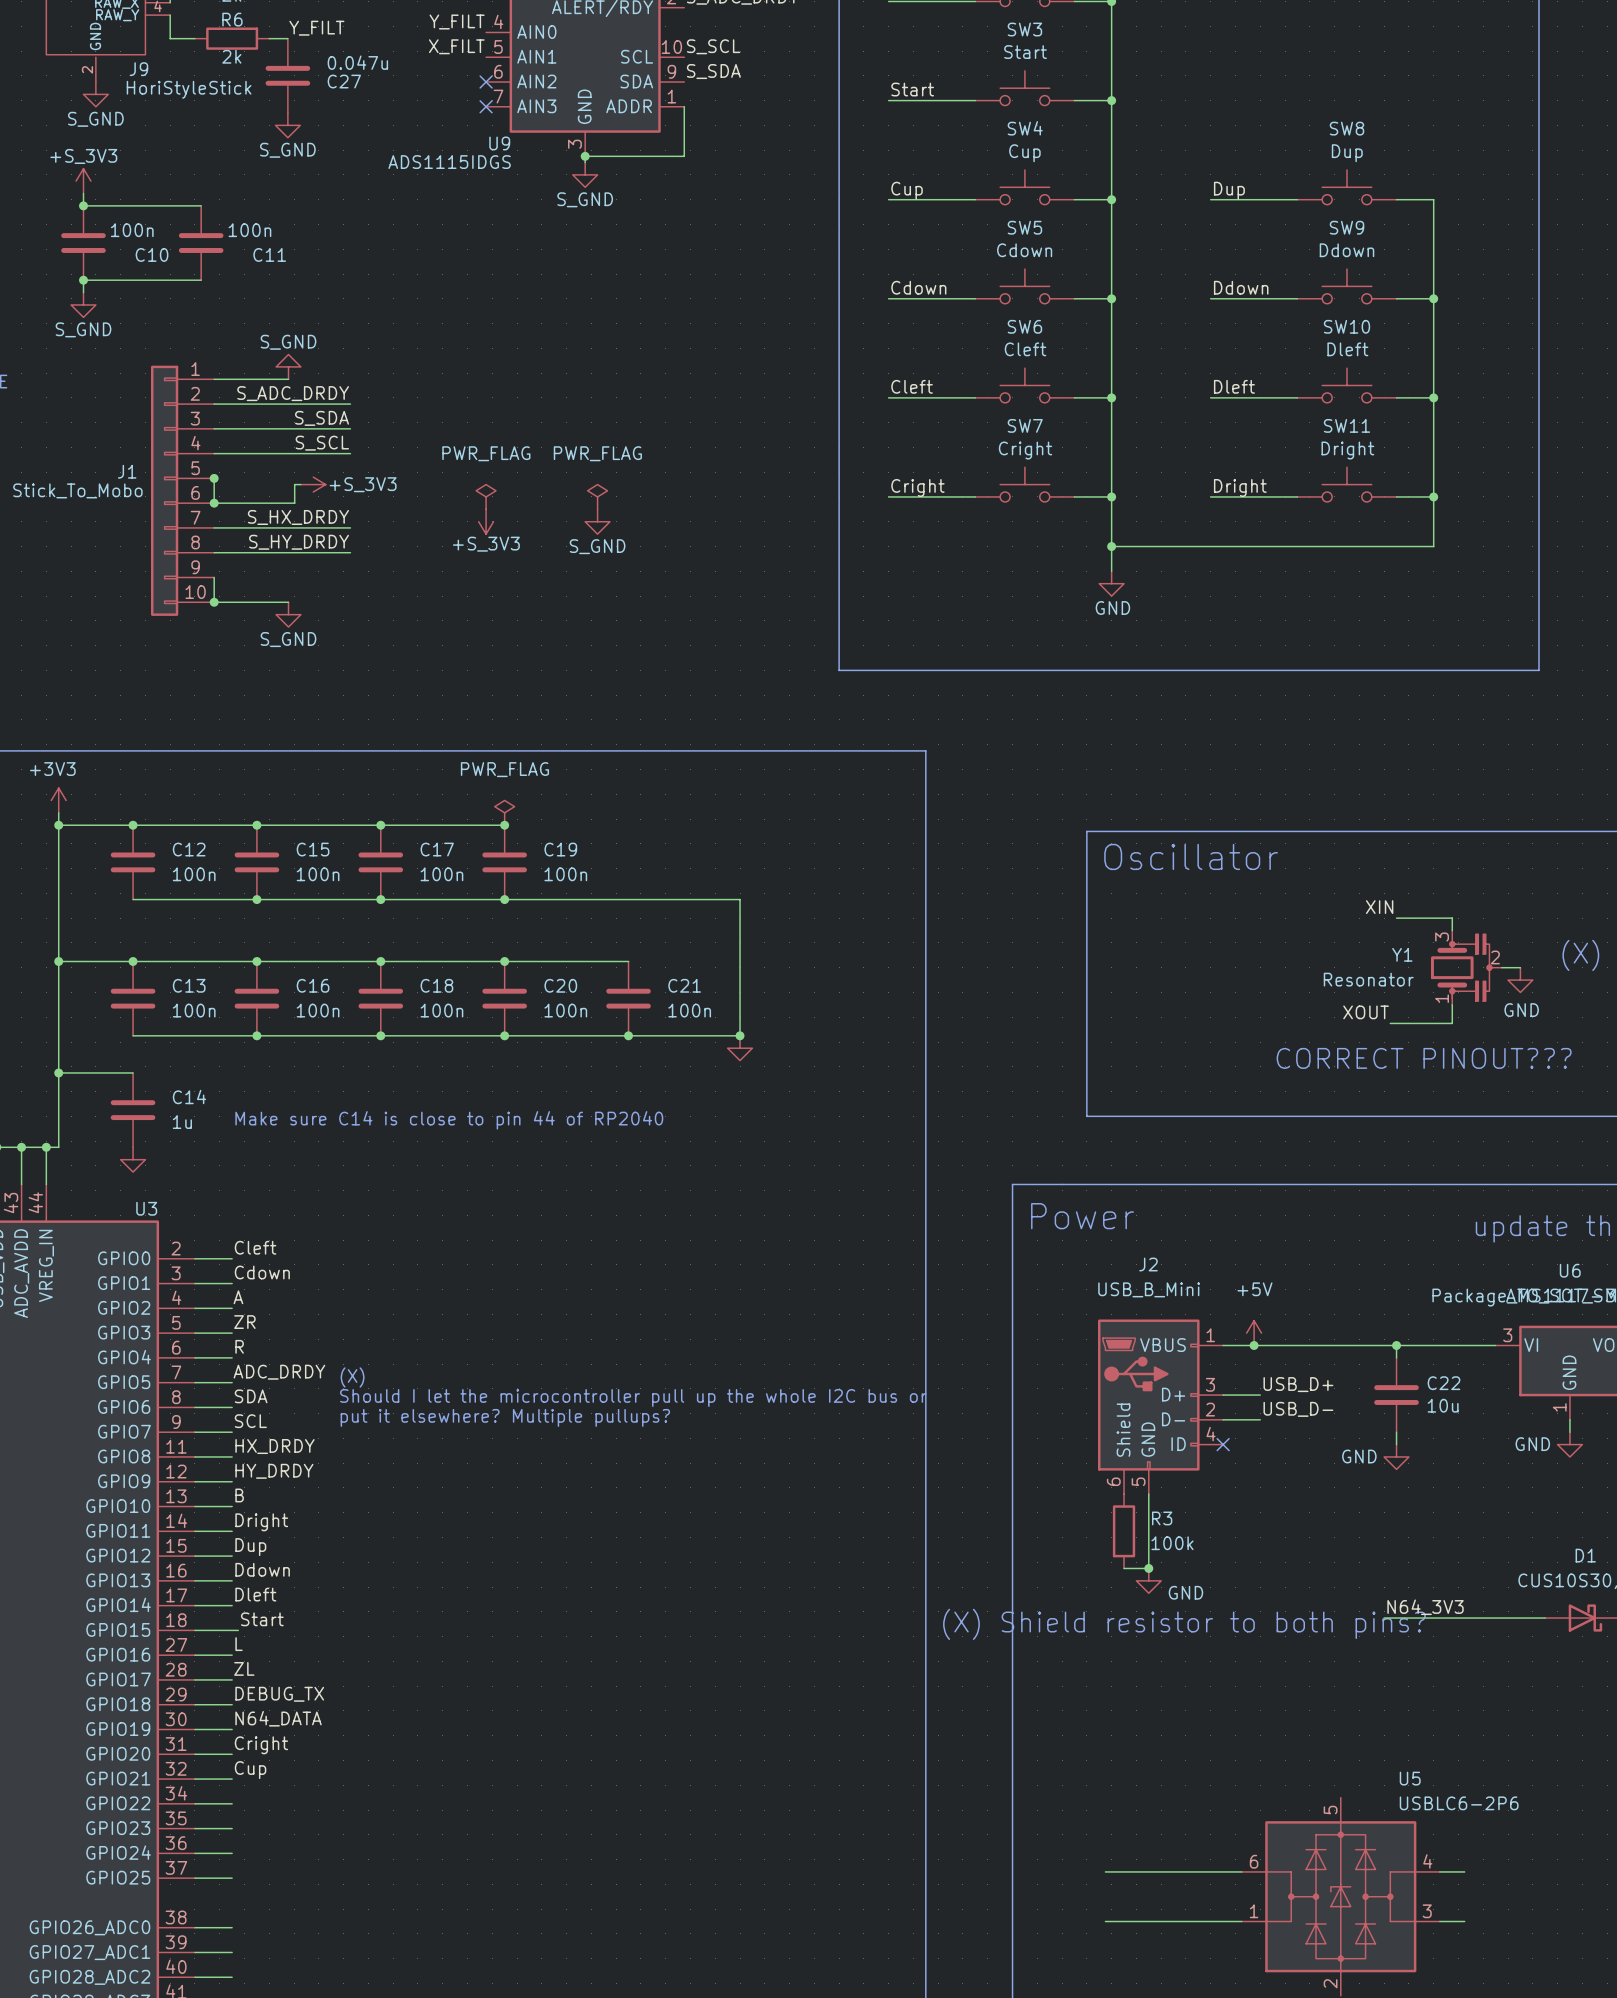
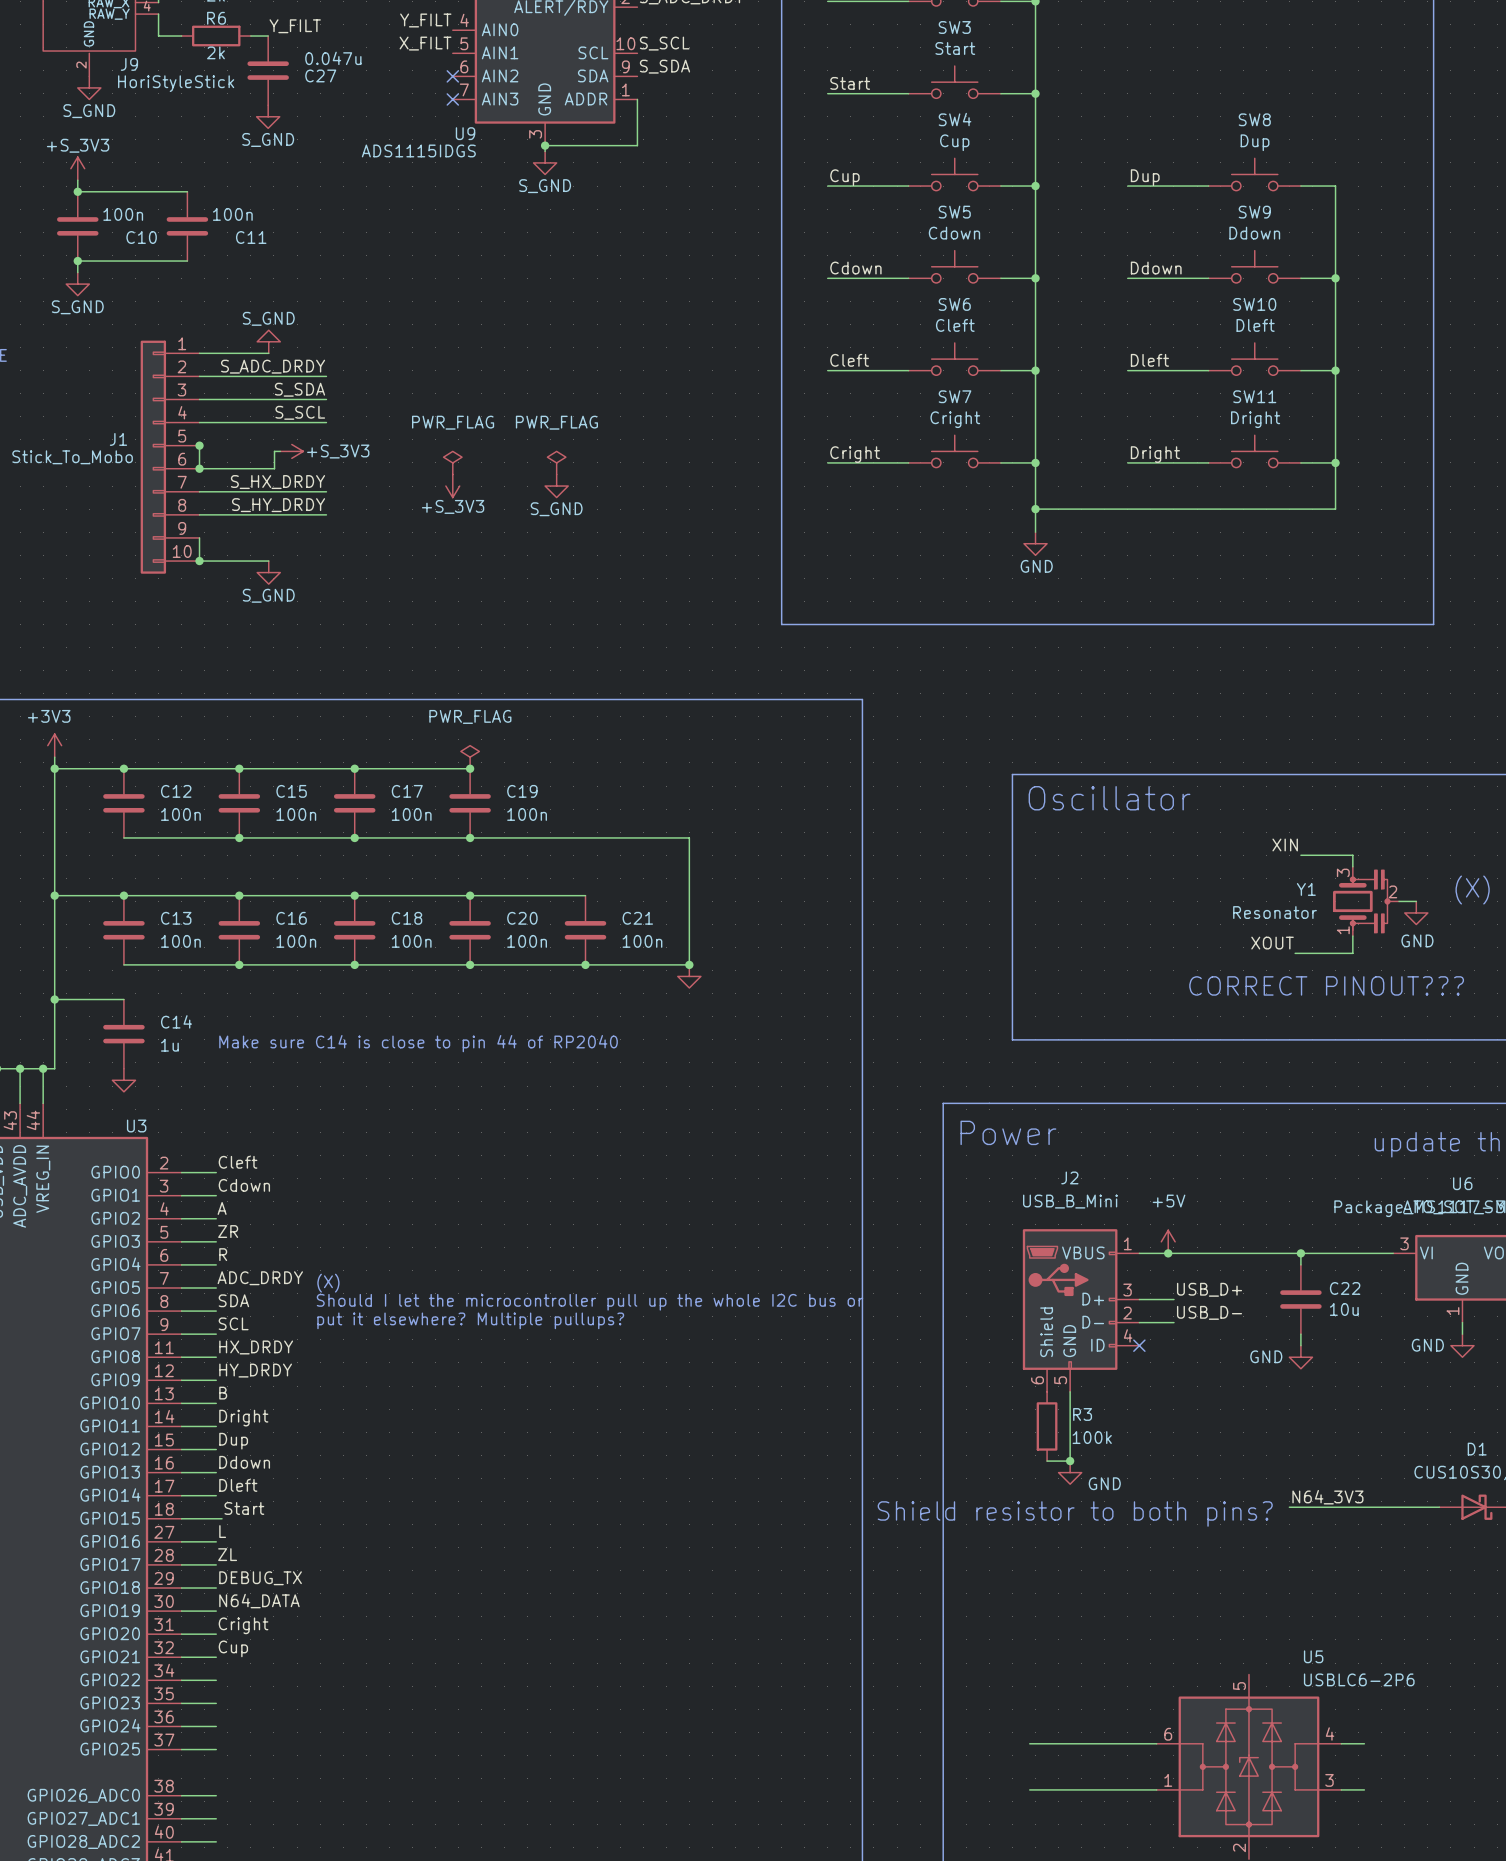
text: (X) Shield resistor to both pins? (1184, 1624) -> Shield resistor to both pins? (1075, 1513)

